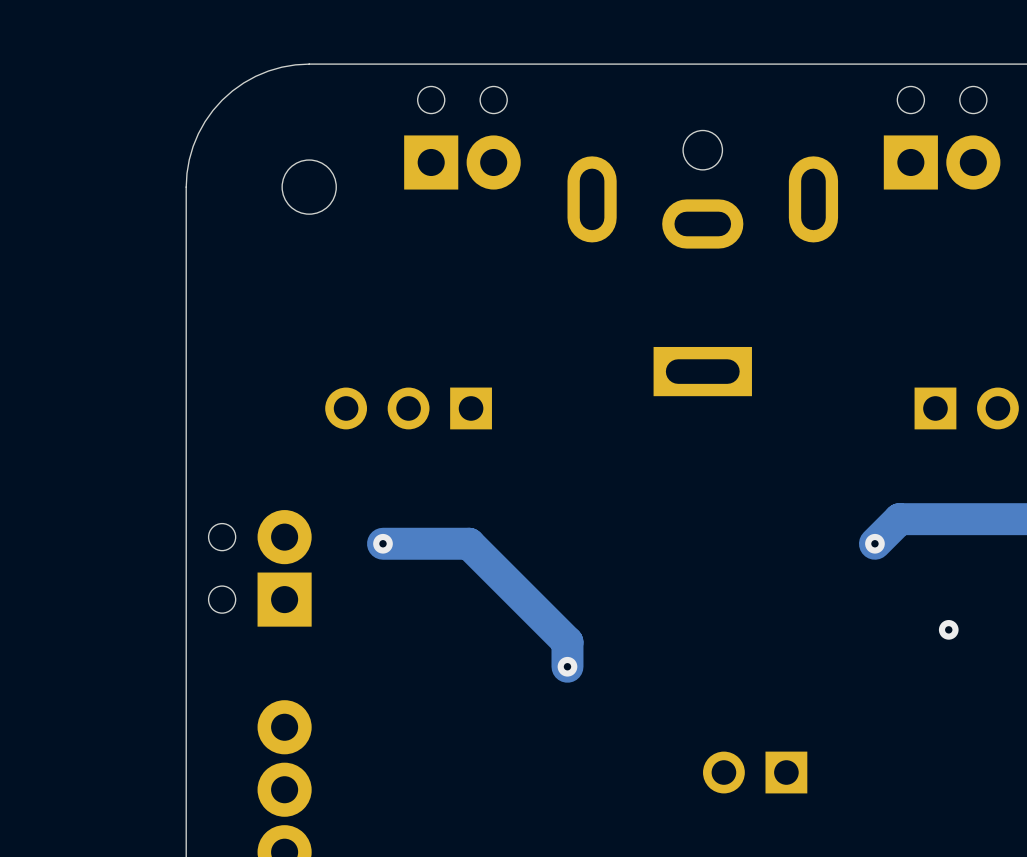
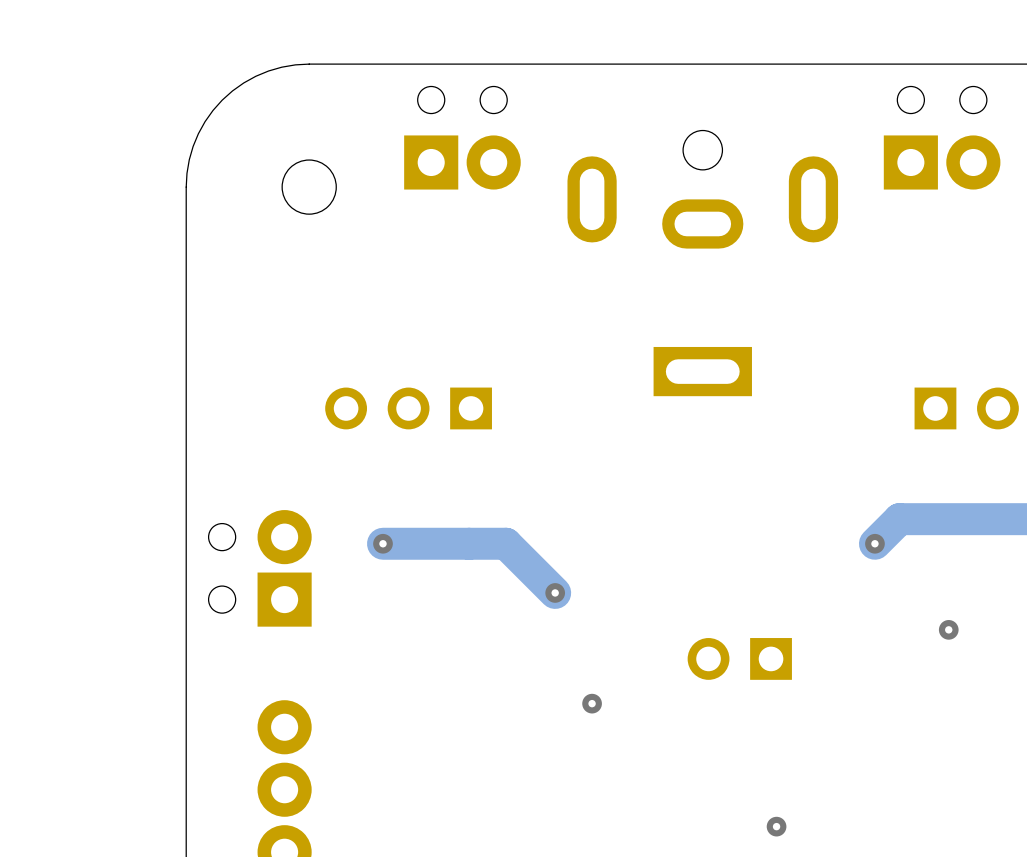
track: (469, 543) (567, 642) (567, 666) -> (469, 543) (505, 543) (555, 592)
via: none -> (555, 592)
via: (567, 666) -> none
via: none -> (592, 703)
part position: (755, 772) -> (739, 658)
via: none -> (776, 826)

